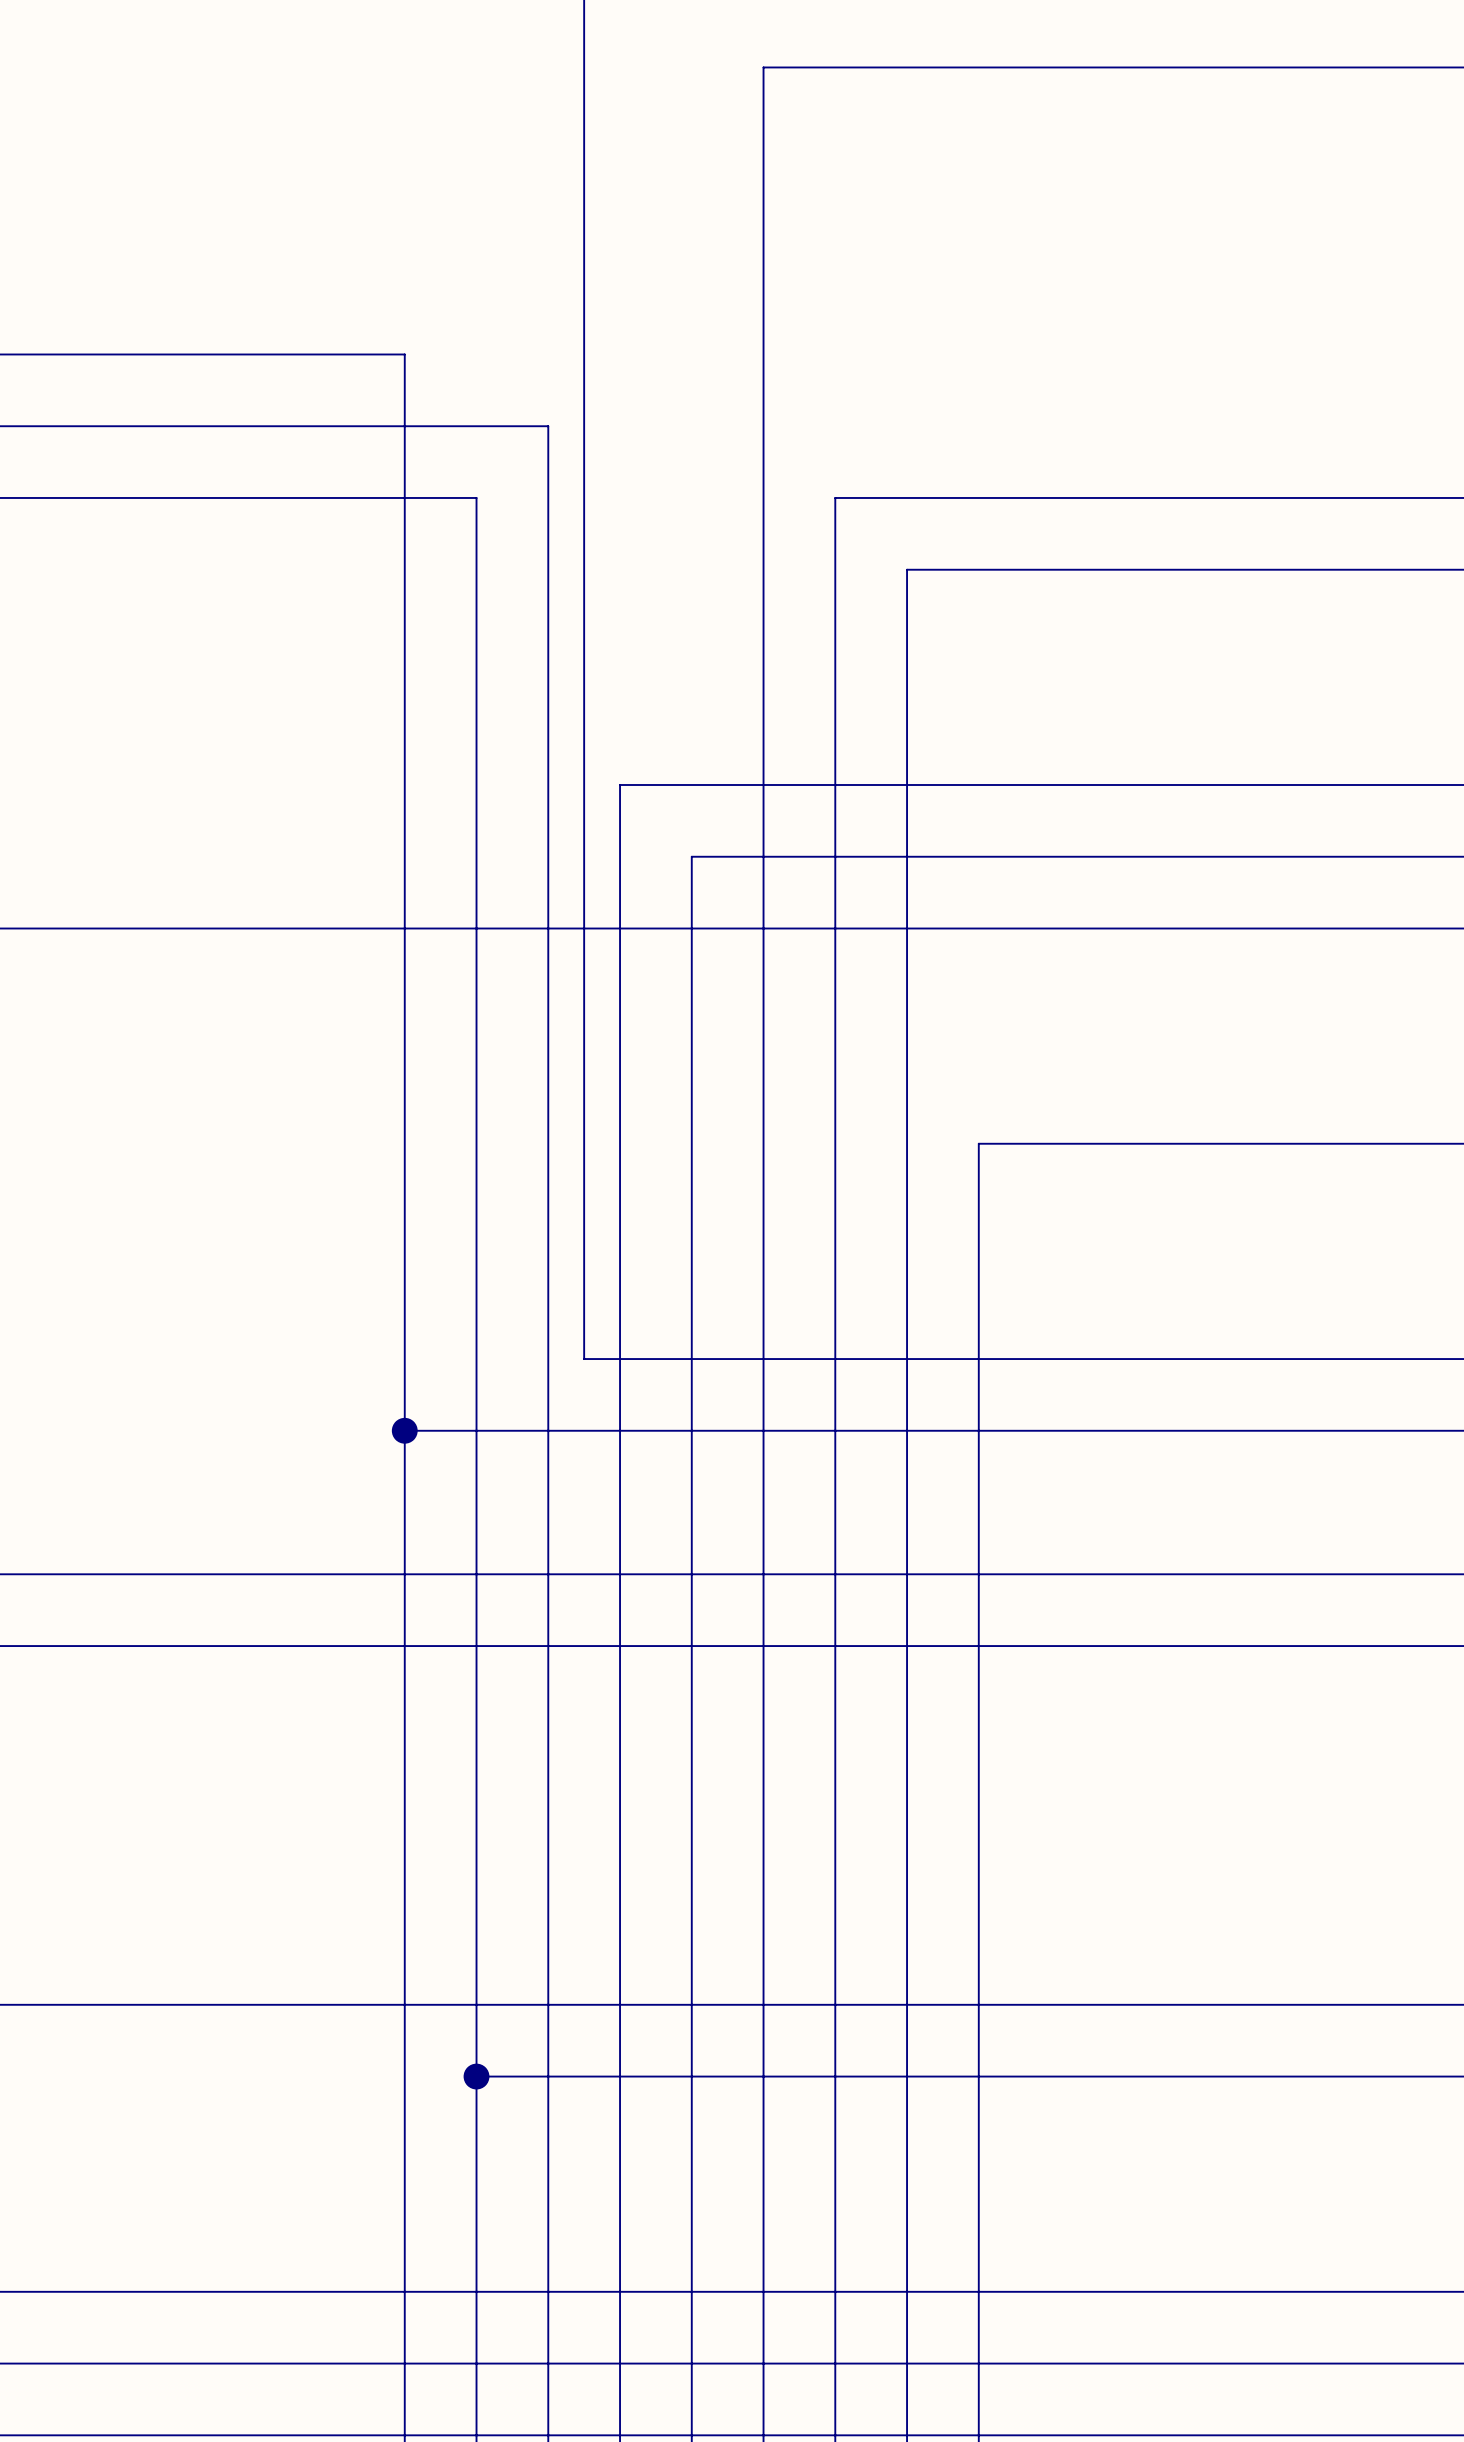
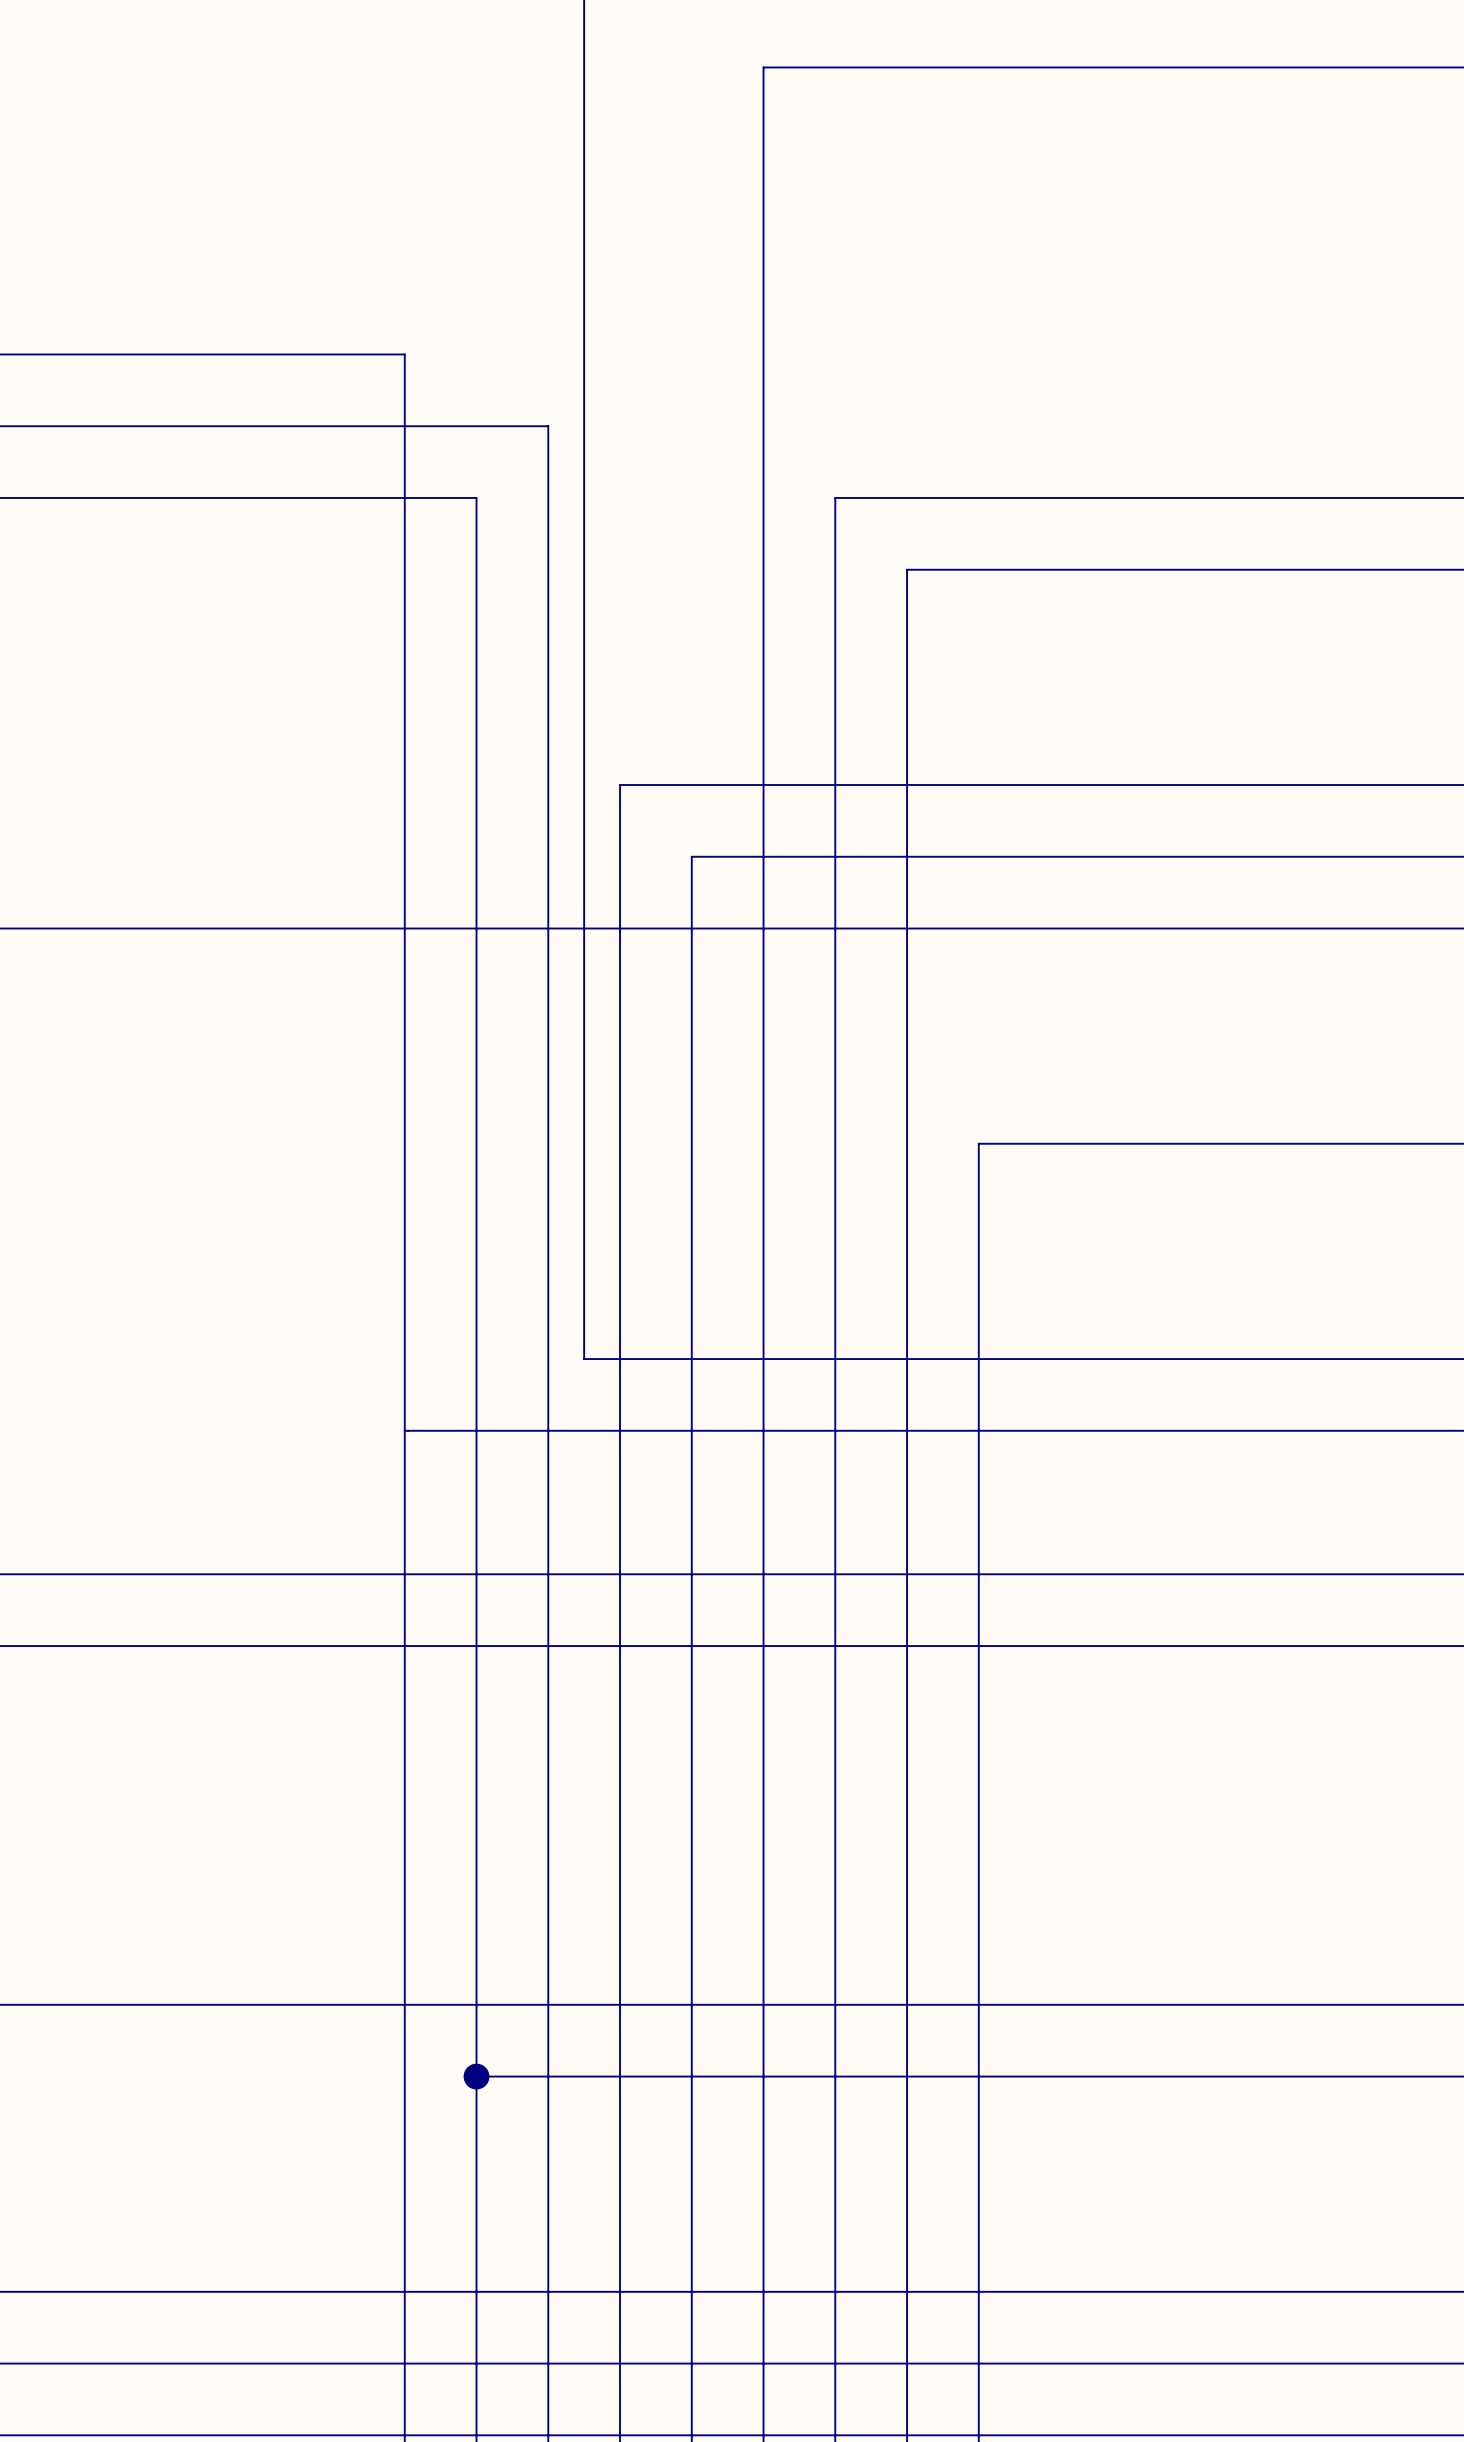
junction: (404, 1430) -> none

